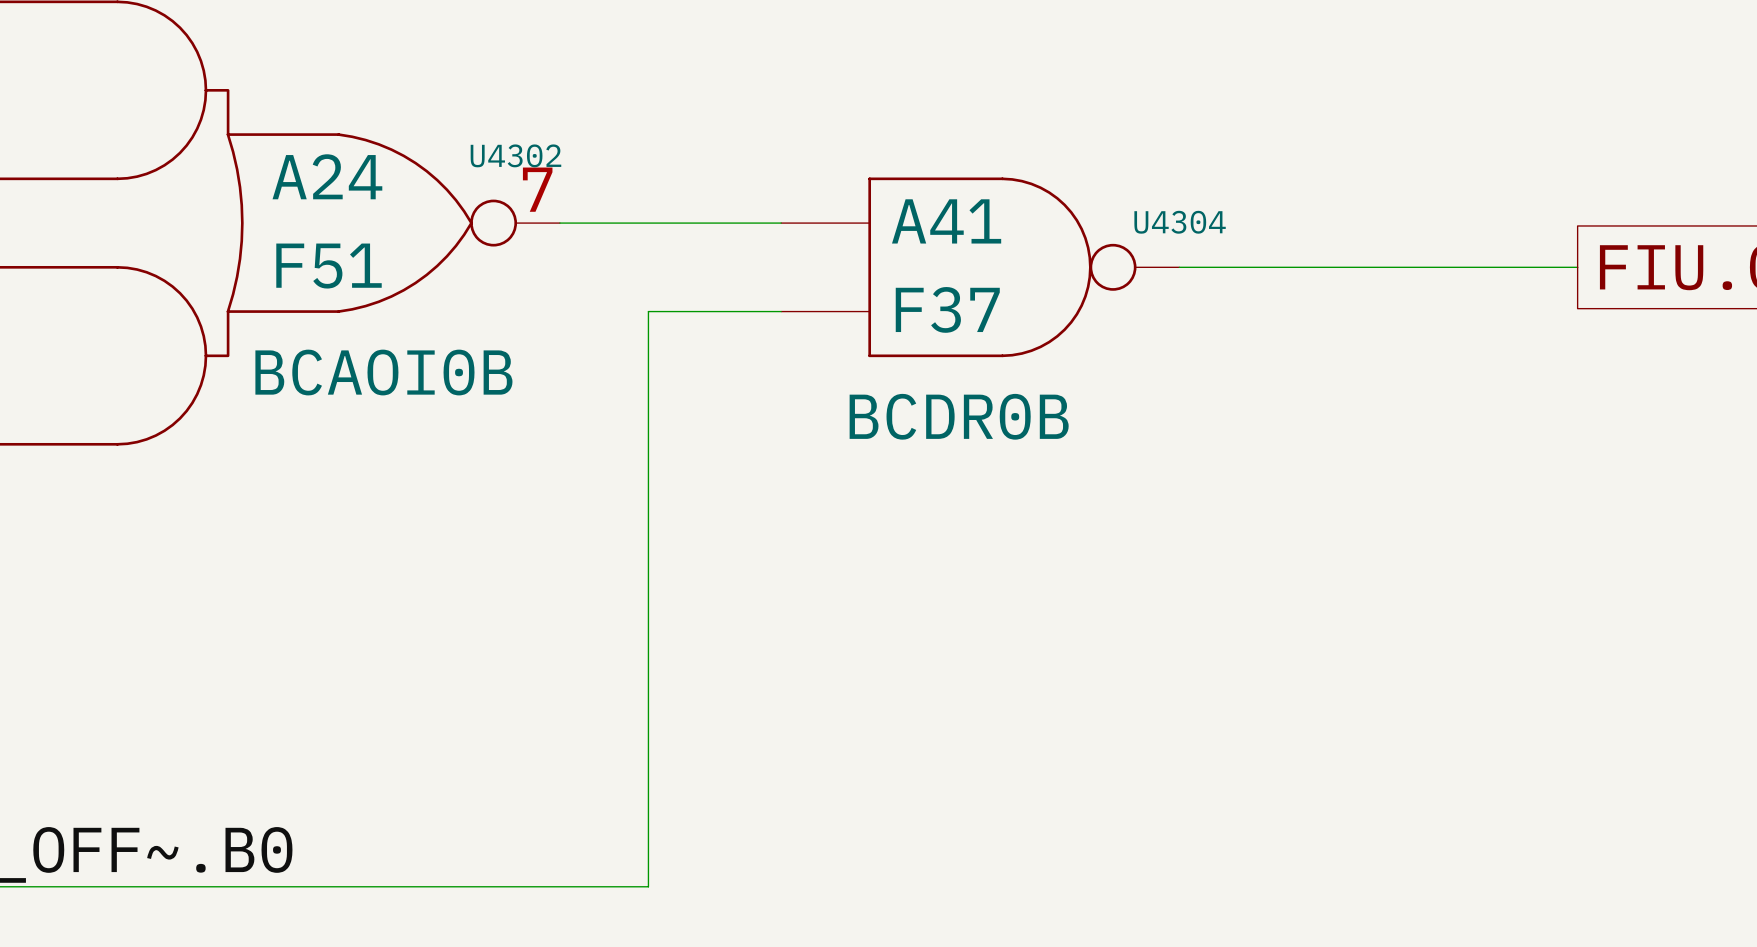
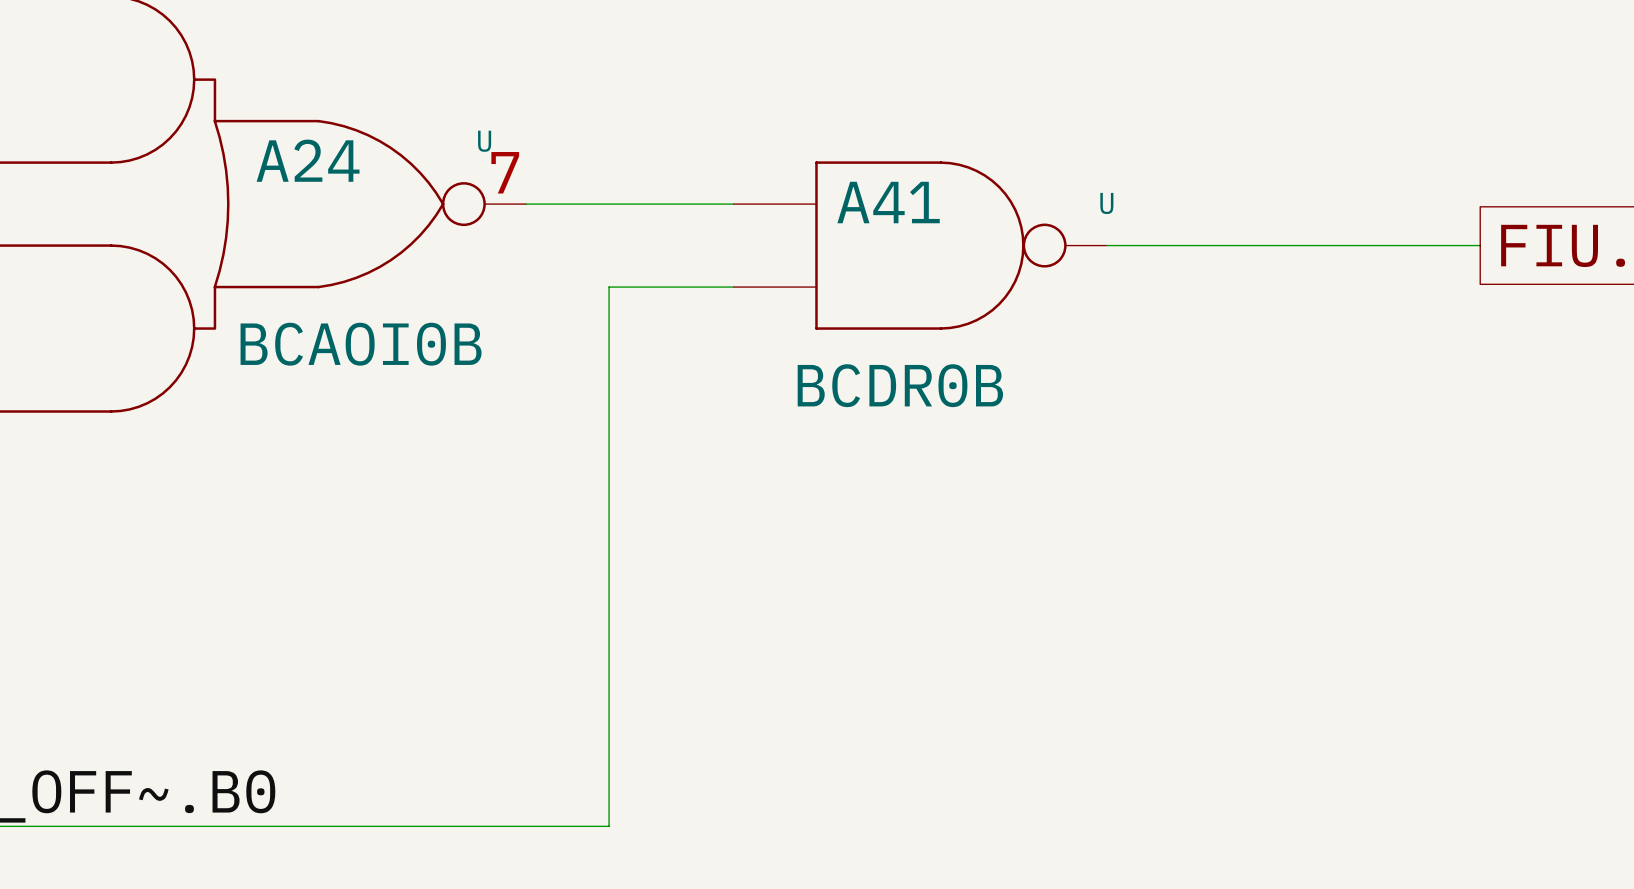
U4302 name: U4302 (515, 155) -> U (484, 141)
U4304 name: U4304 (1180, 222) -> U (1106, 203)
U4302 value: F51 (329, 266) -> none
U4304 value: F37 (947, 309) -> none

